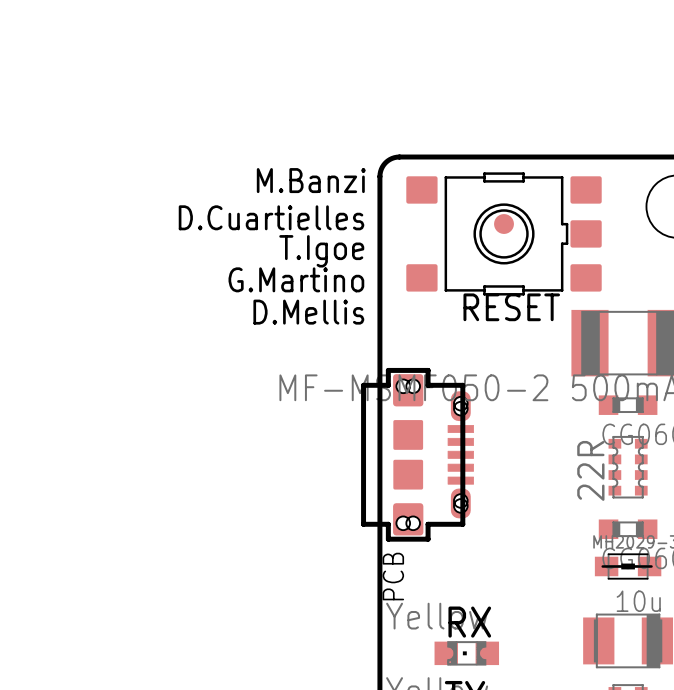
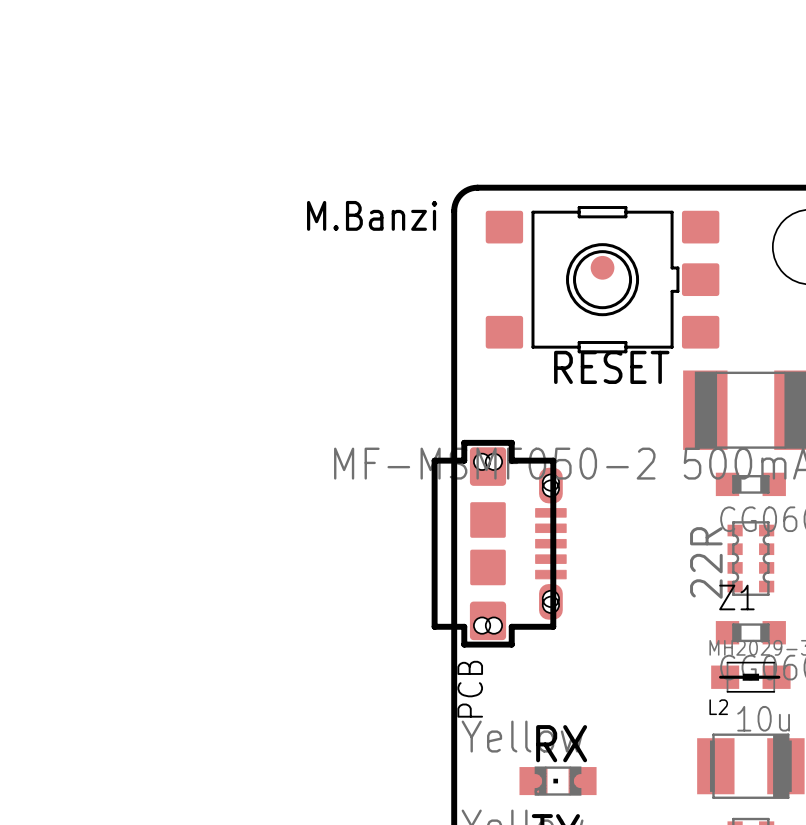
text: D.Cuartielles (271, 217) -> none
text: T.Igoe (321, 251) -> none
text: G.Martino (296, 279) -> none
text: D.Mellis (308, 312) -> none
Z1 name: none -> Z1 (736, 597)
L2 name: none -> L2 (718, 707)

